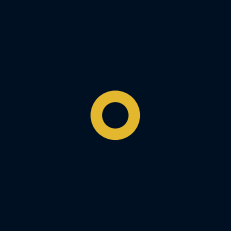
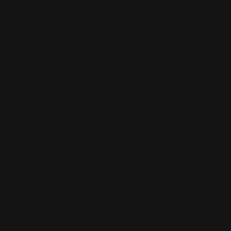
part: (115, 115) -> none

